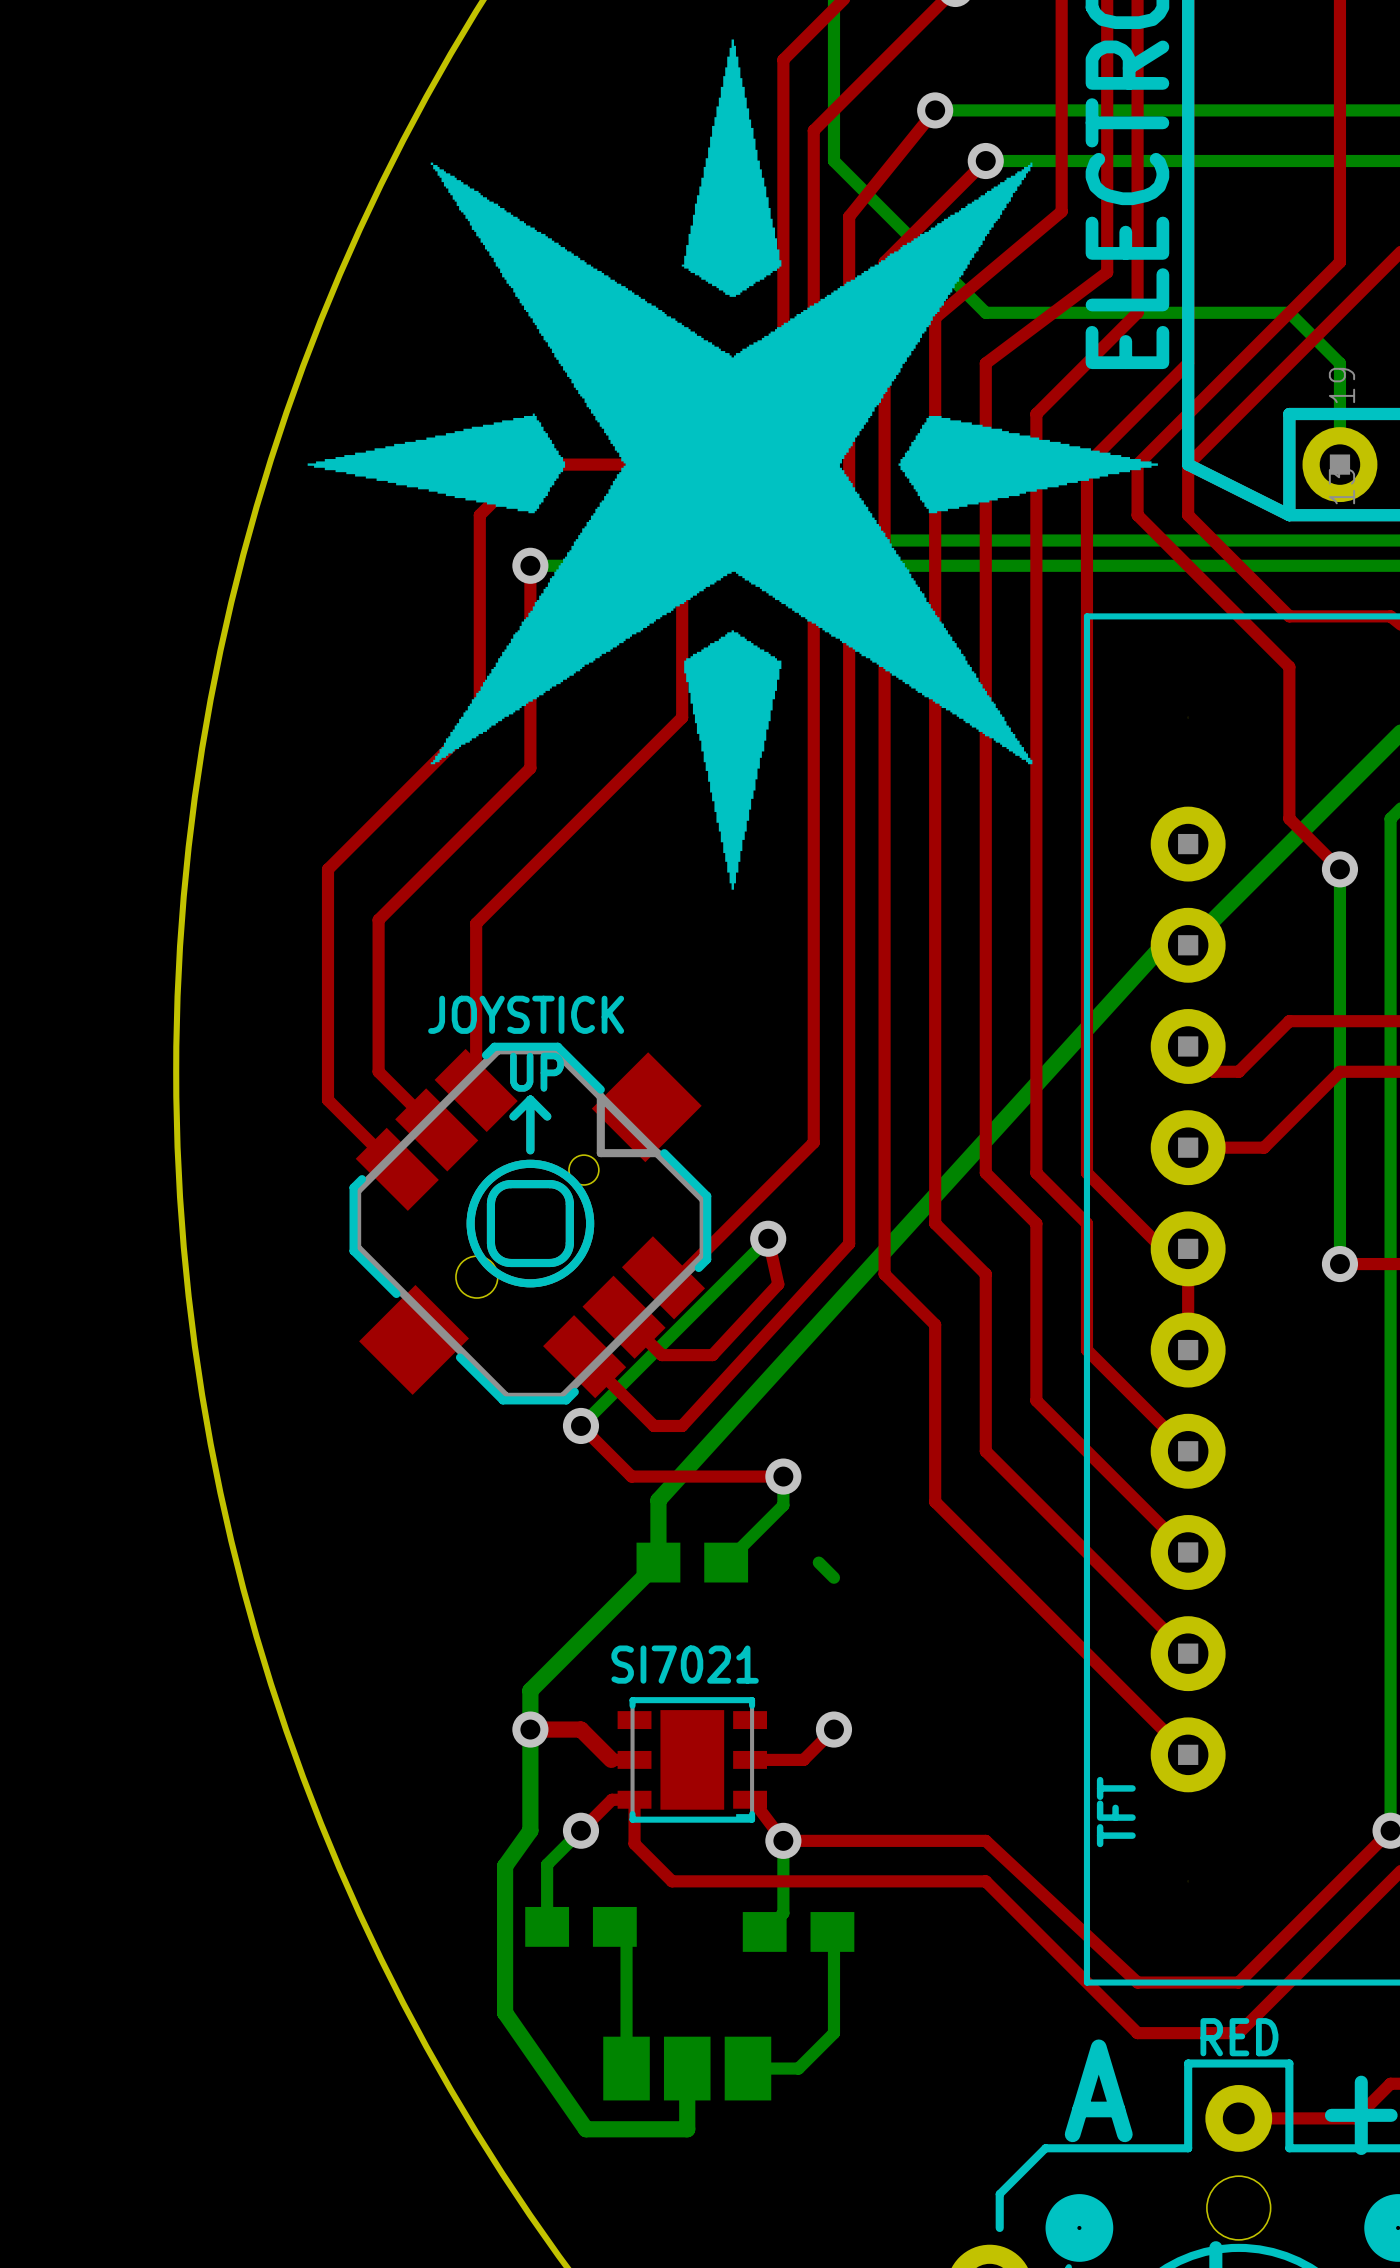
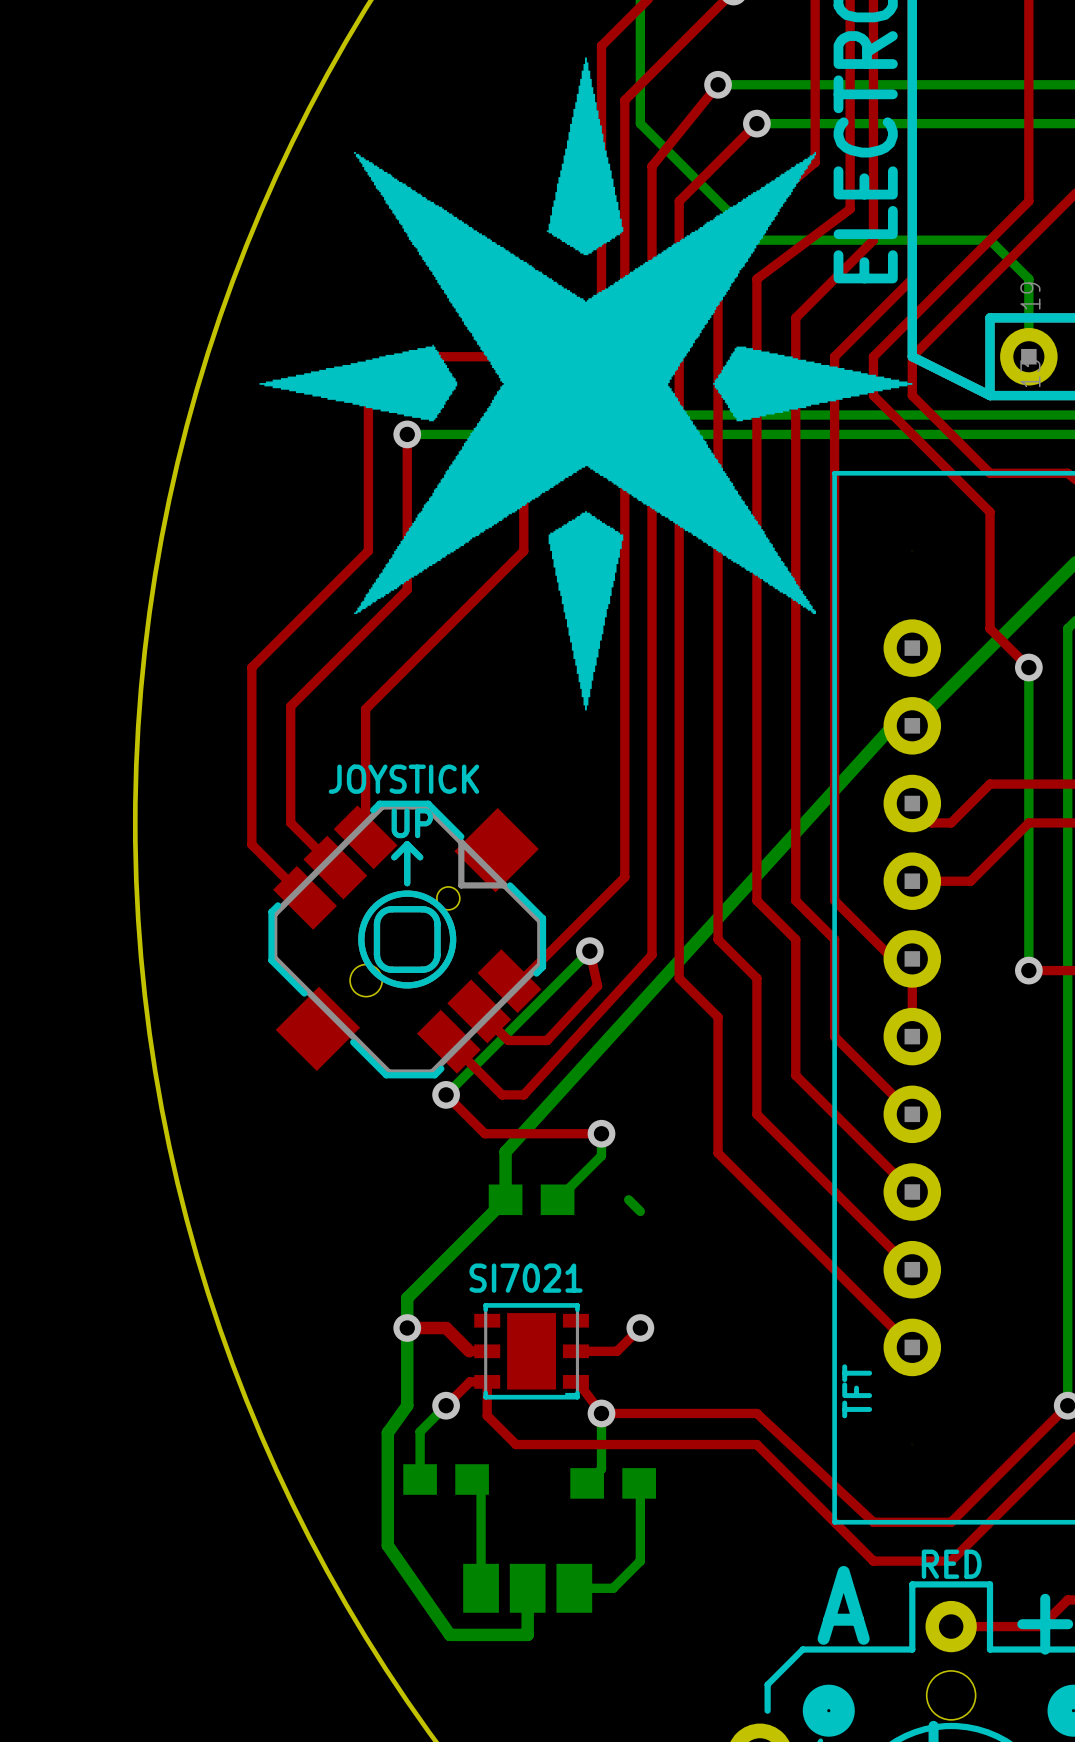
drawing position: (732, 464) -> (585, 383)

